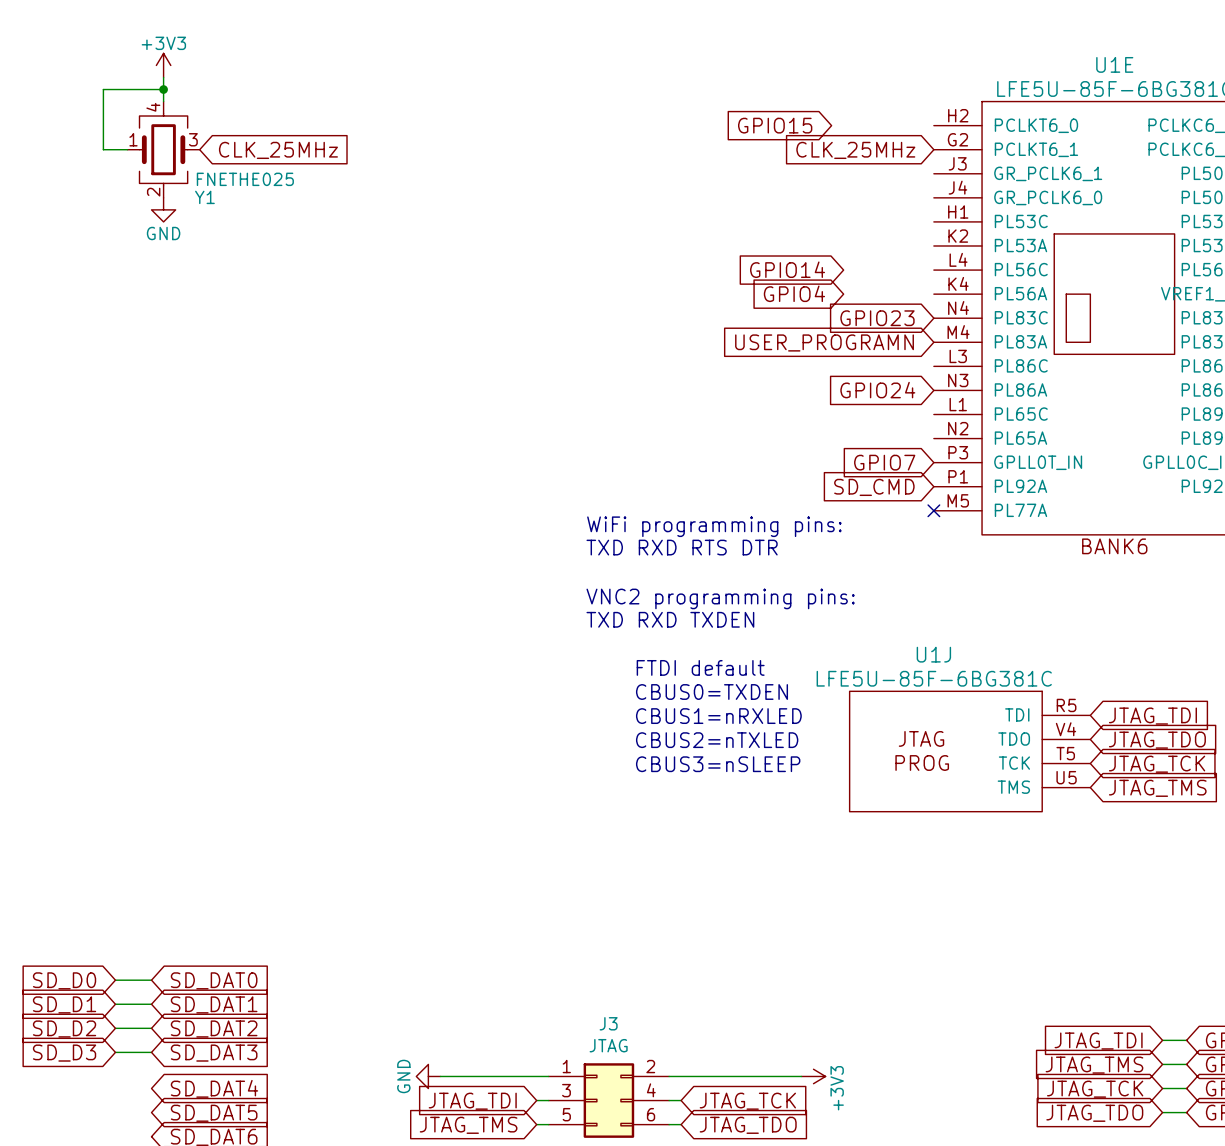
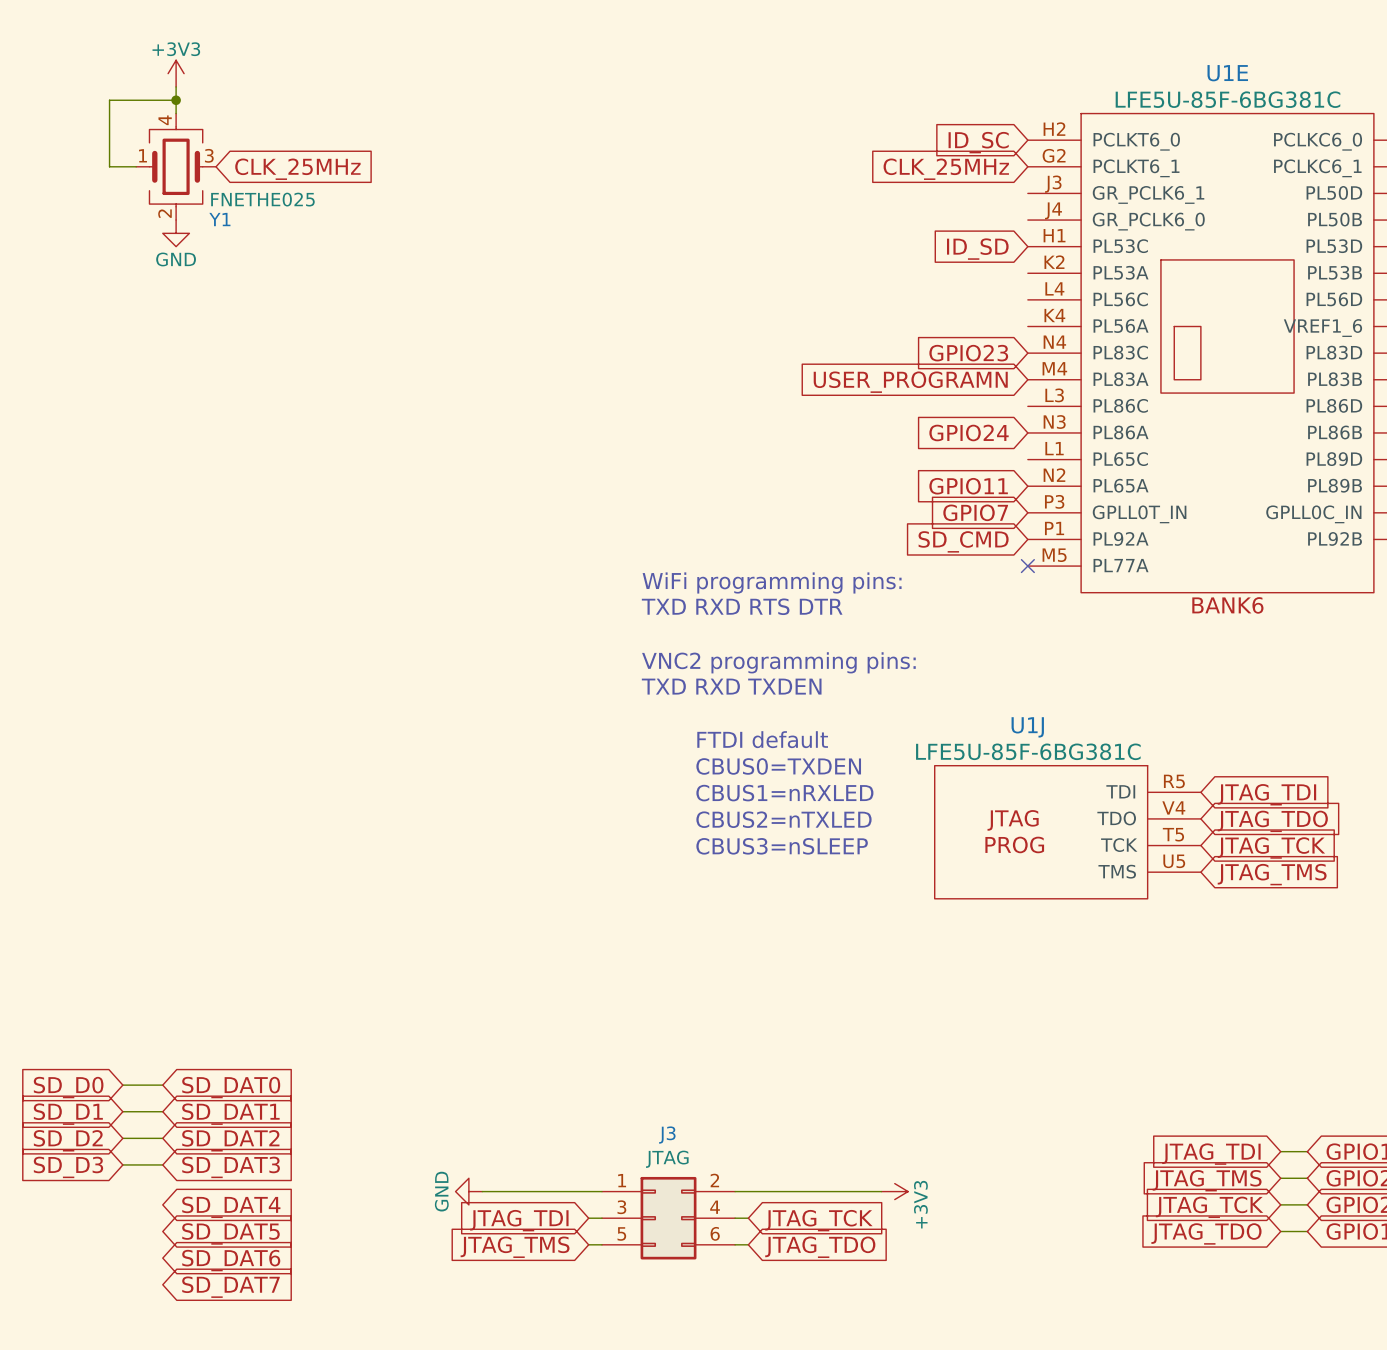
global label: GPIO15 (775, 125) -> none
global label: none -> ID_SC (978, 142)
global label: none -> ID_SD (977, 249)
global label: GPIO14 (787, 269) -> none
global label: GPIO4 (794, 293) -> none
global label: none -> GPIO11 (968, 486)

